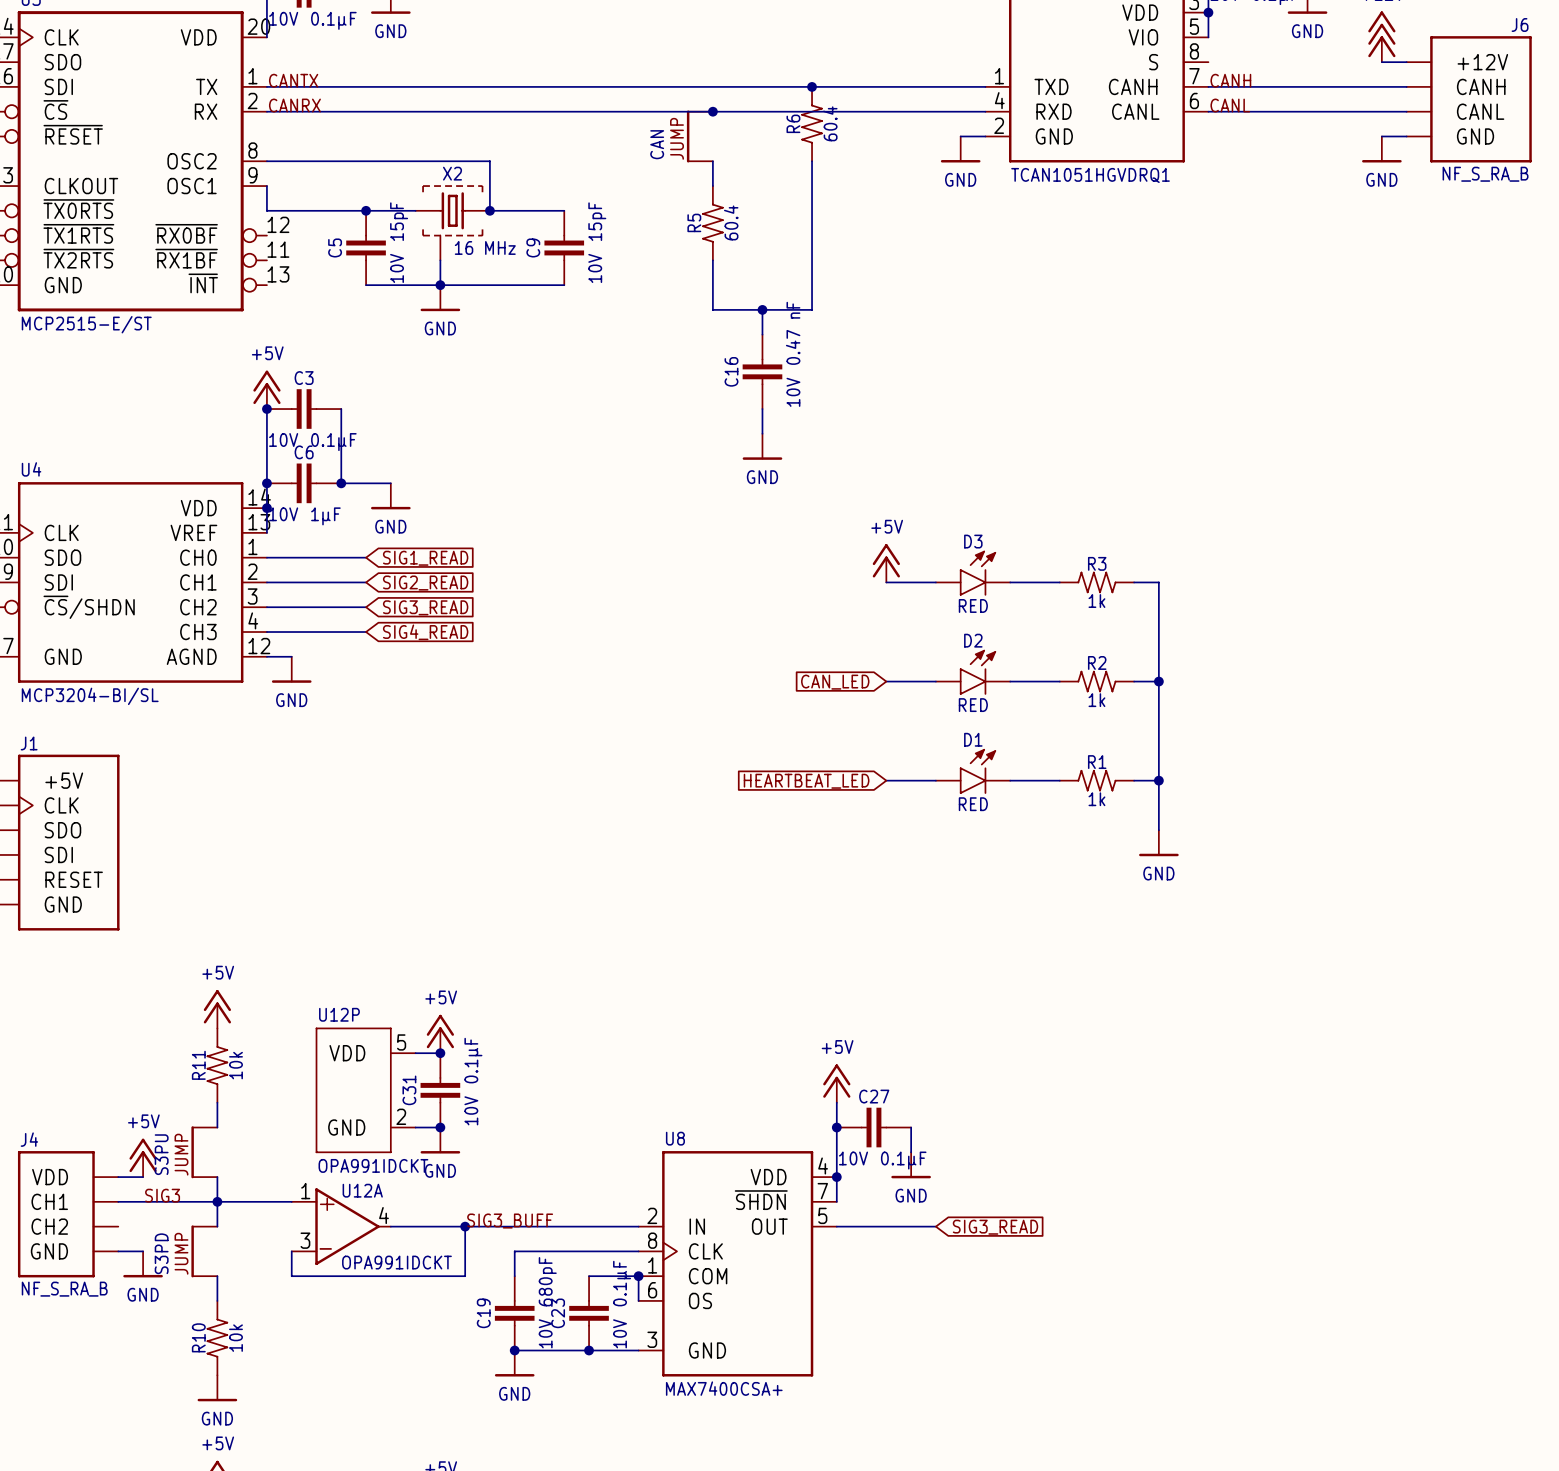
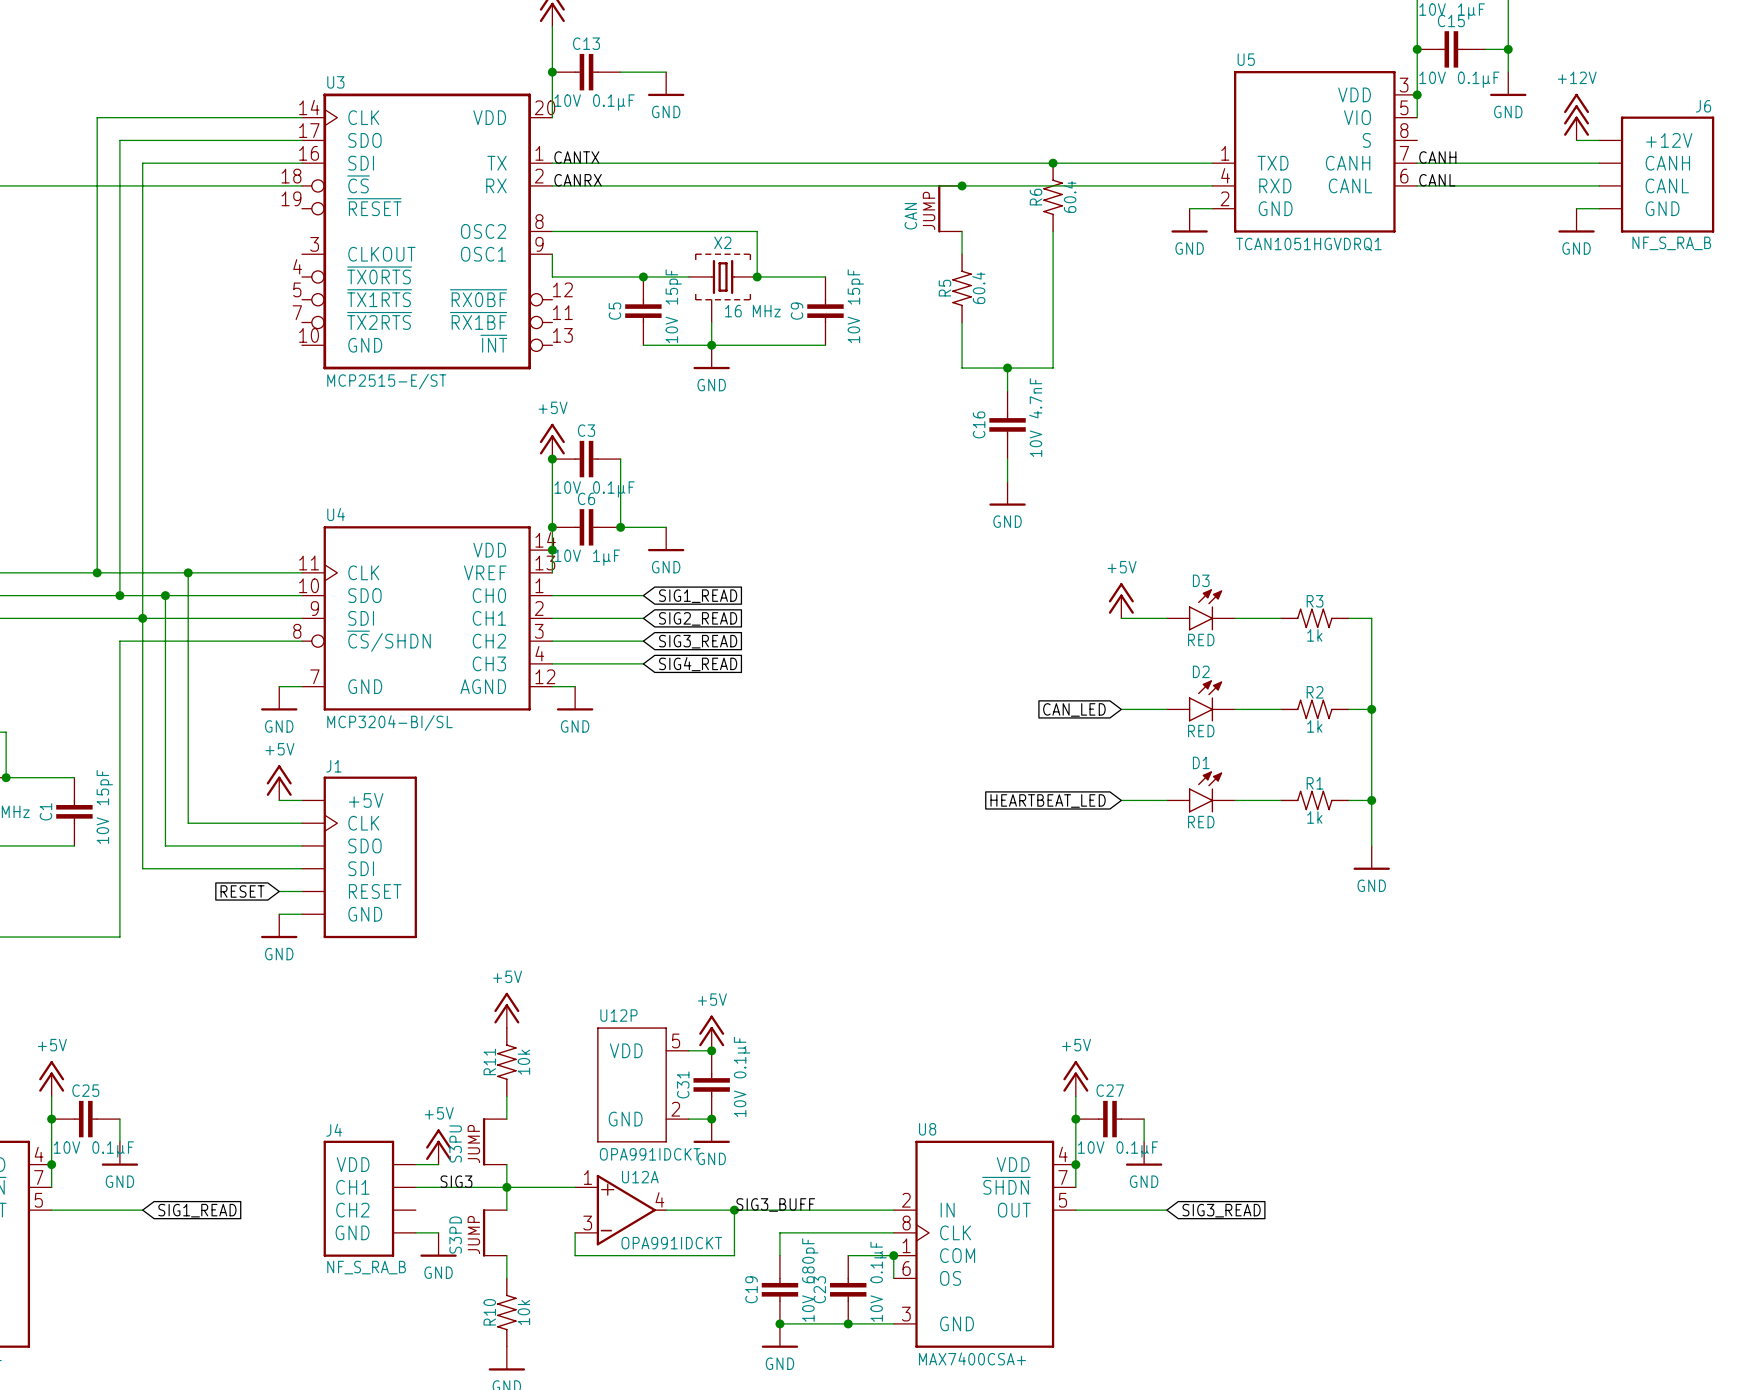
C16 text: 0.47 nF (793, 333) -> 4.7nF (1035, 398)

